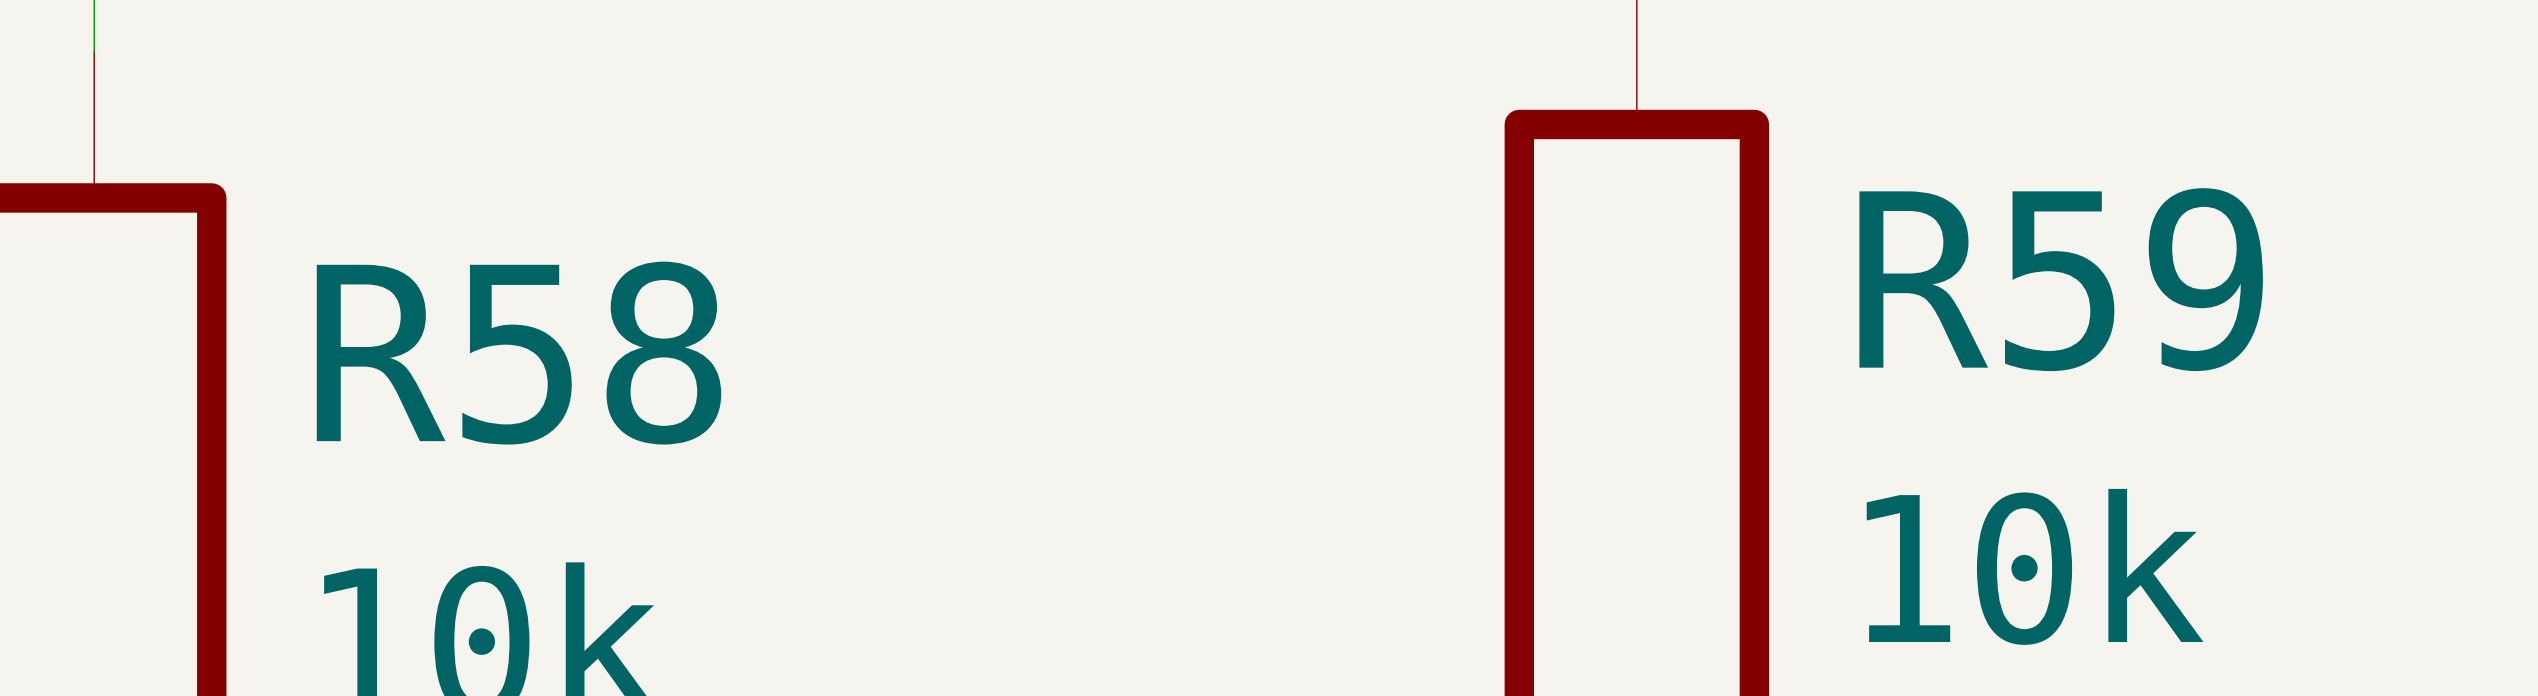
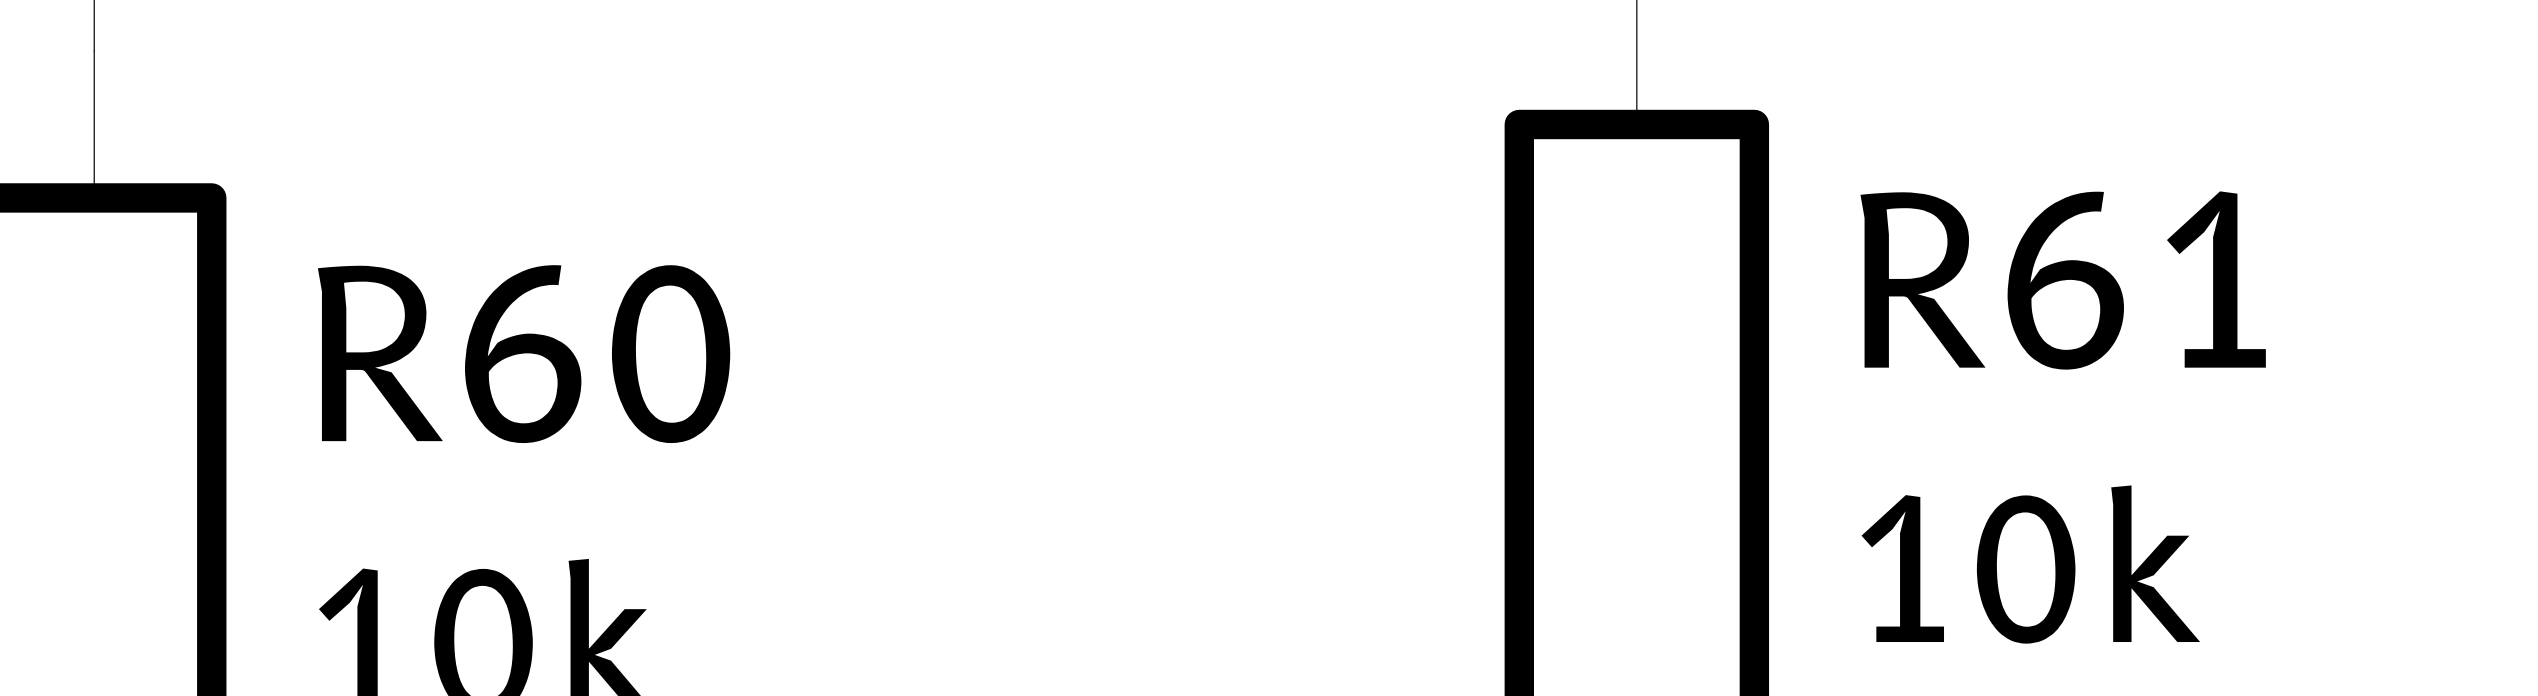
R59 name: R59 (2061, 279) -> R61 (2063, 280)
R58 name: R58 (519, 353) -> R60 (524, 354)

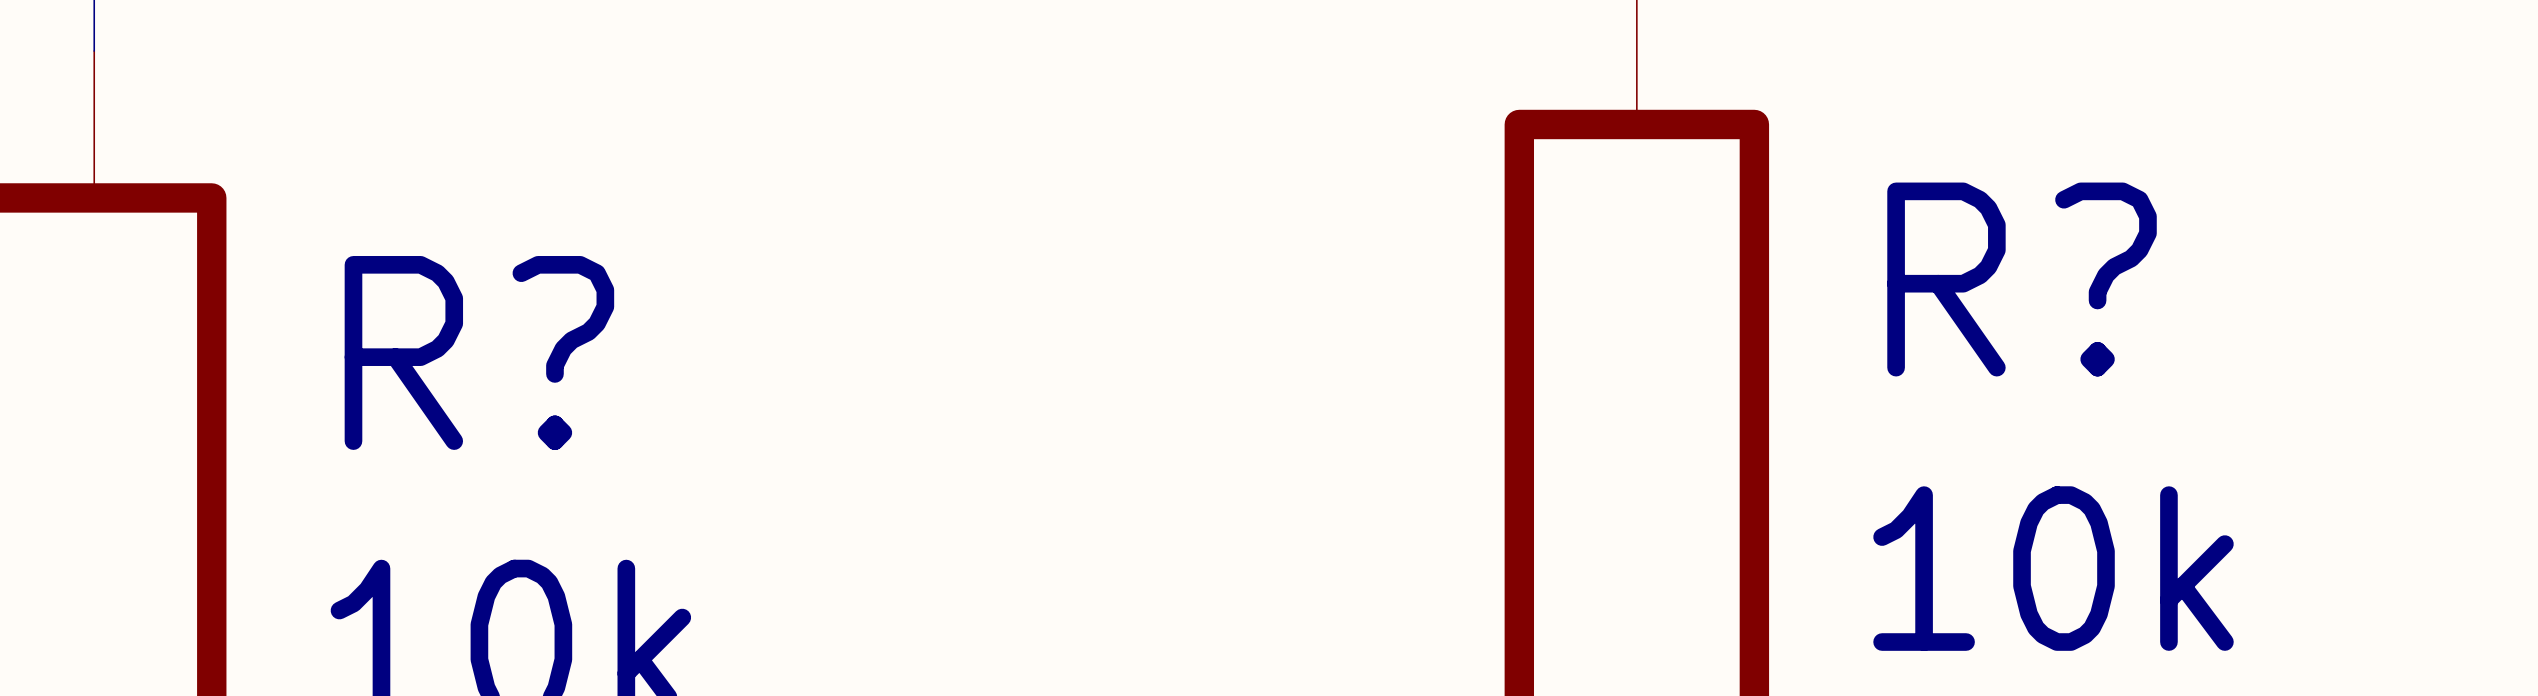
R61 name: R61 (2063, 280) -> R? (2022, 279)
R60 name: R60 (524, 354) -> R? (479, 352)

